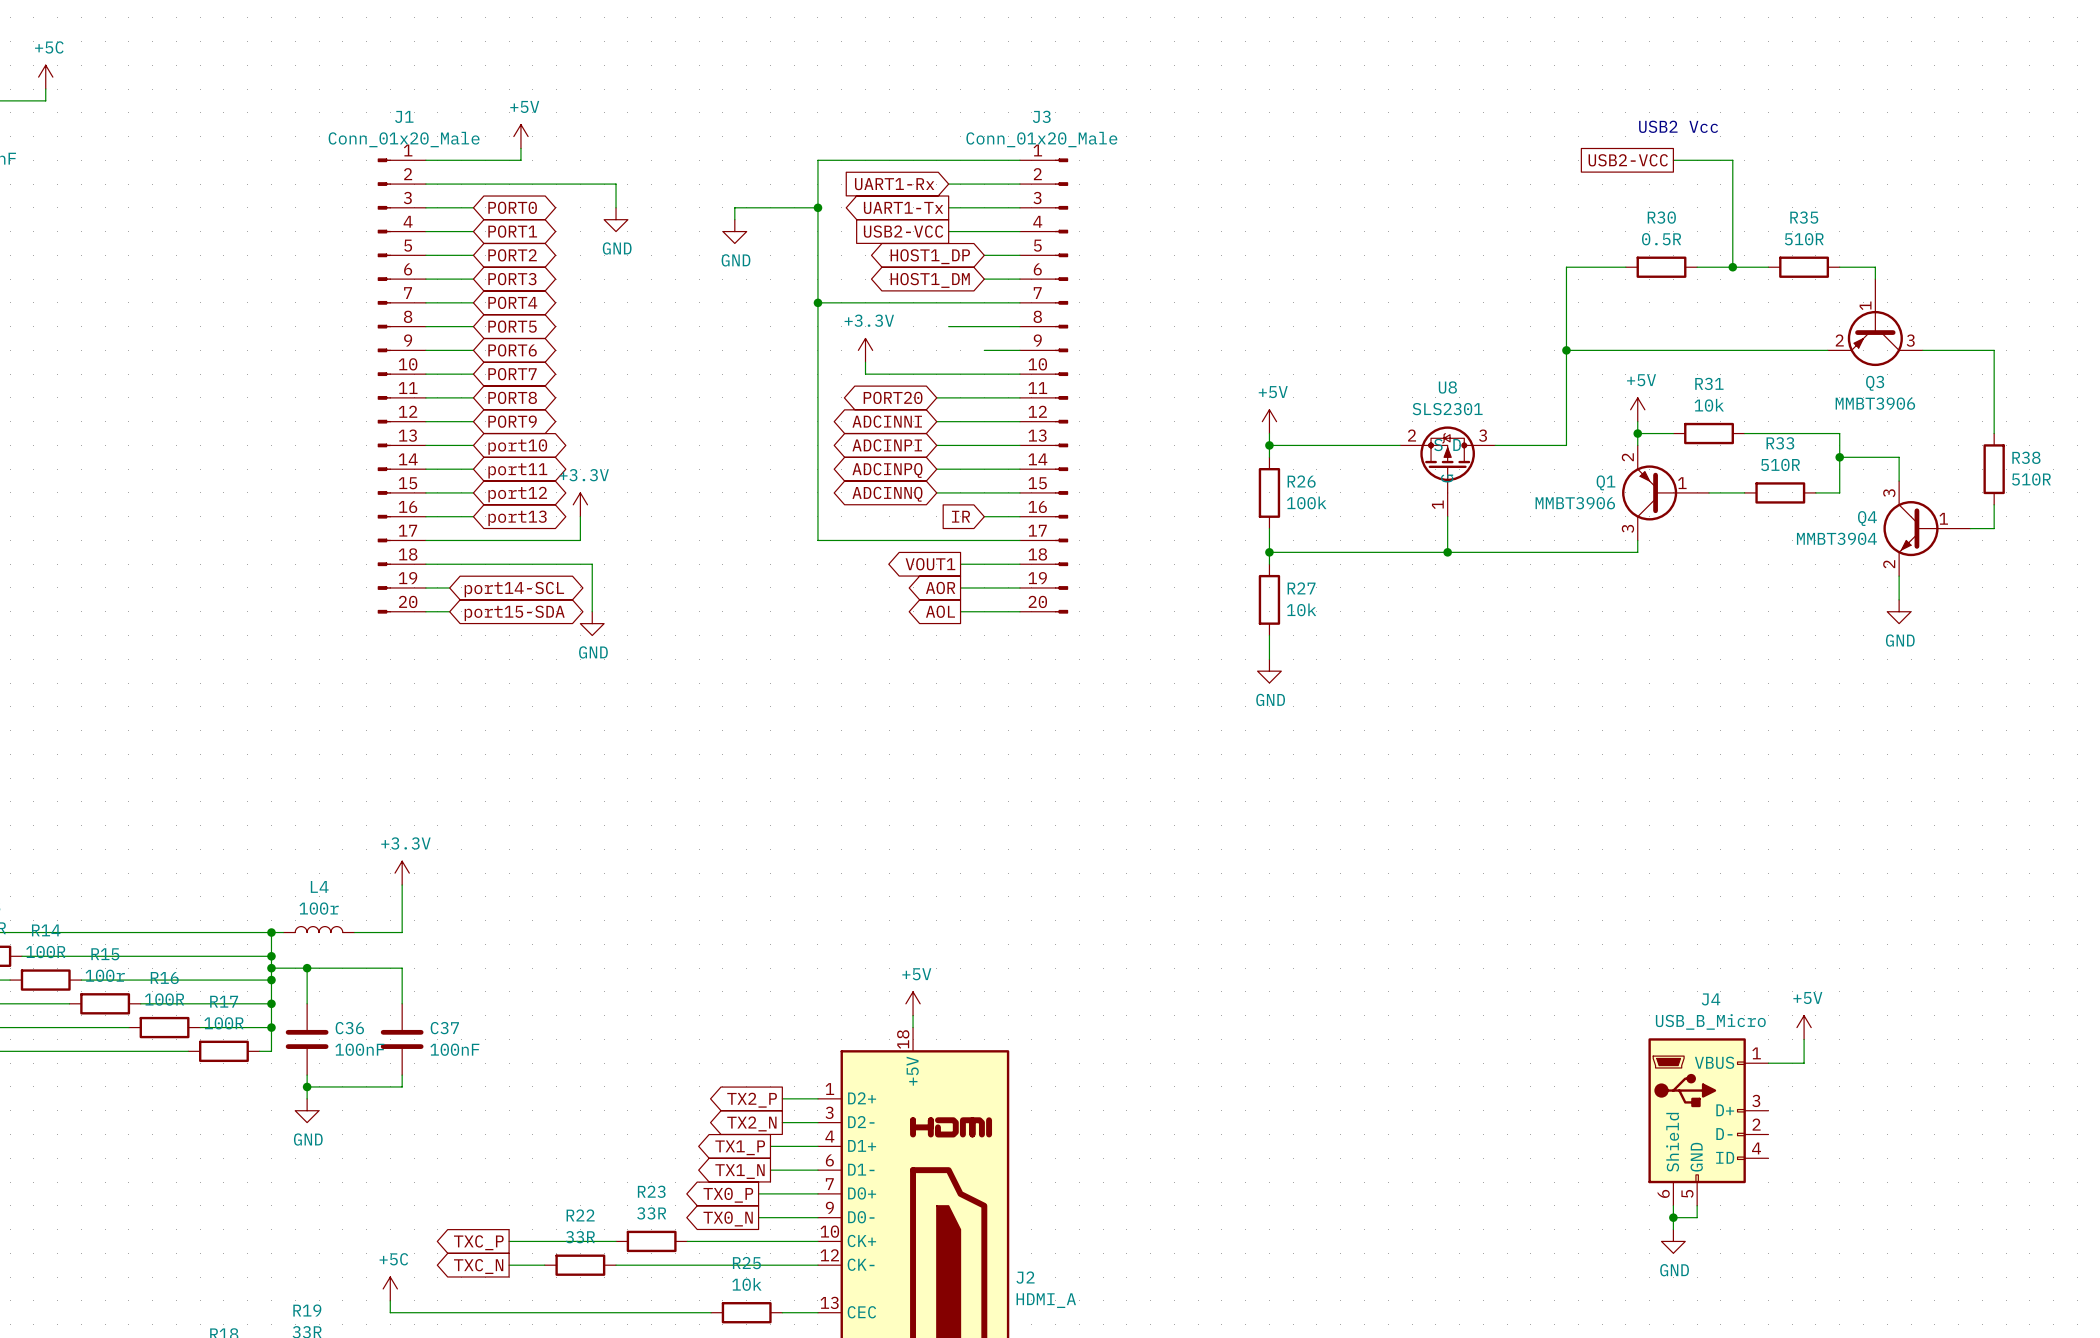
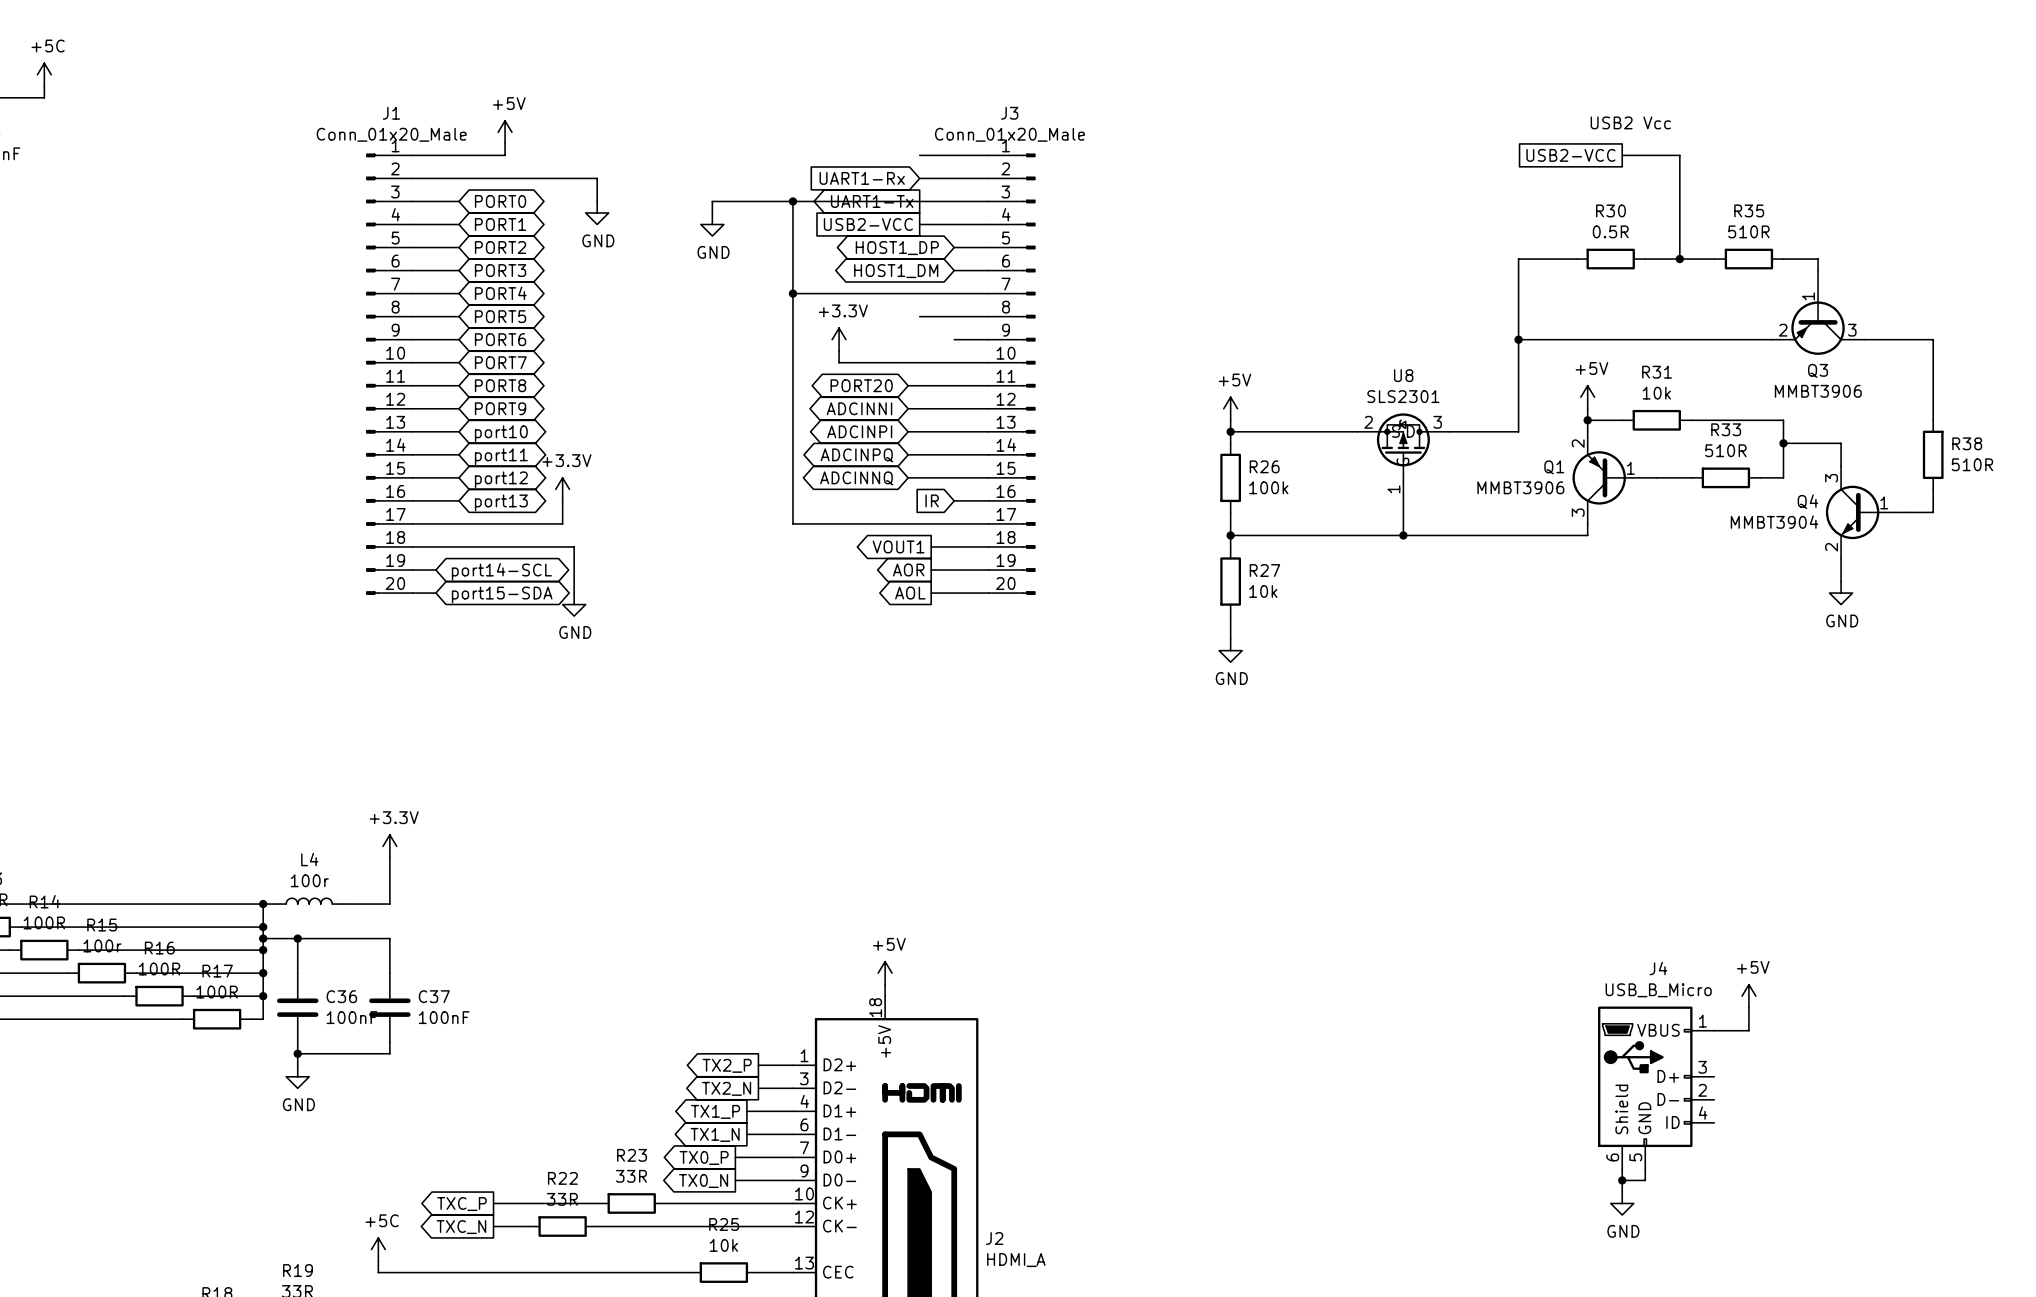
wire: (948, 160) (817, 160) (817, 207) -> (919, 201) (792, 201)

